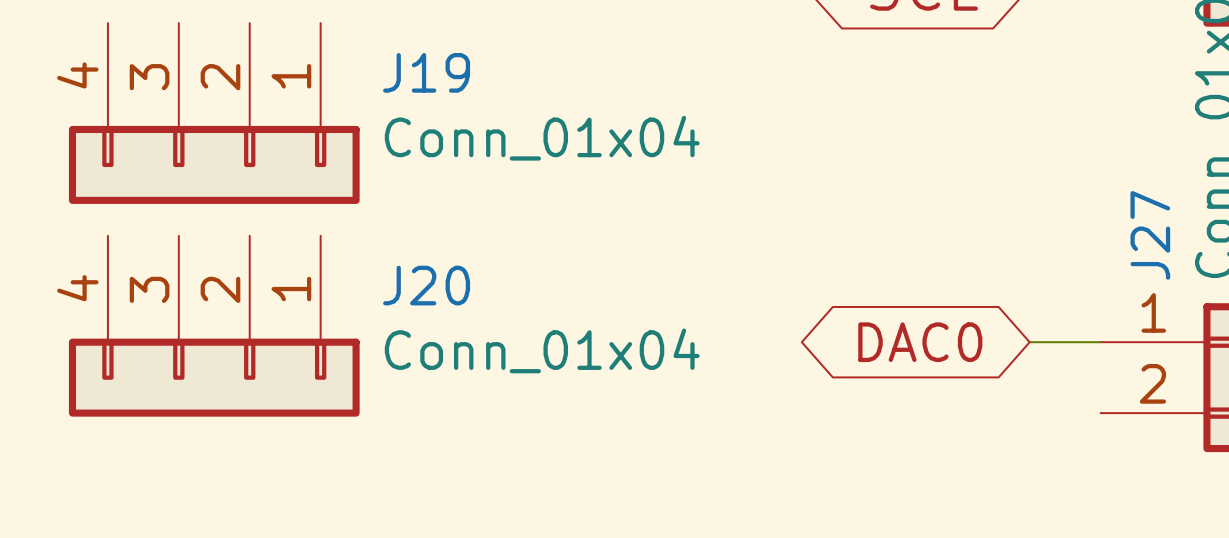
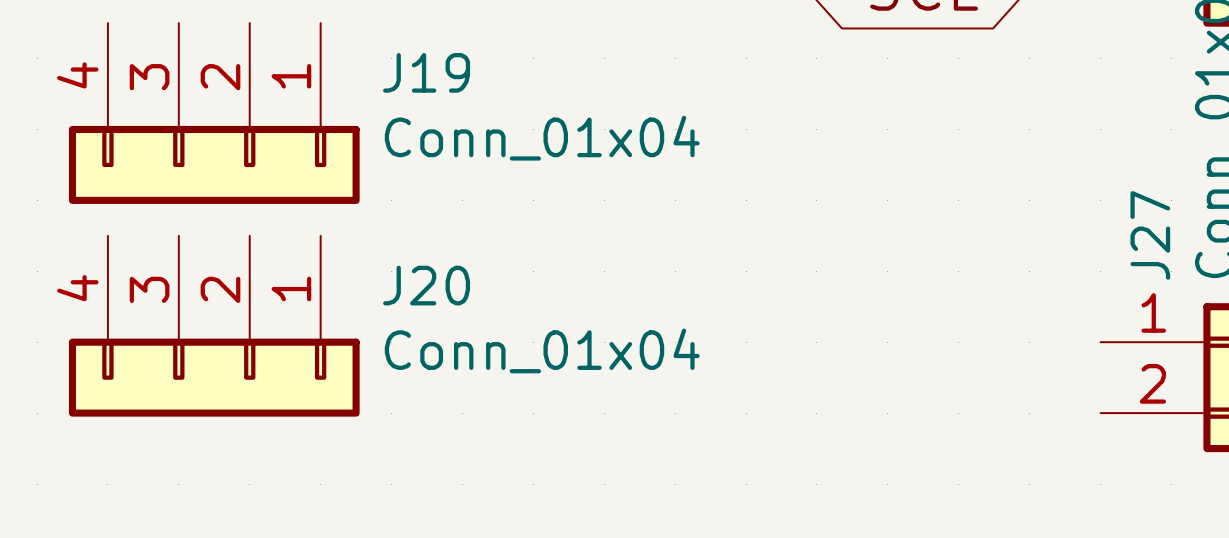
global label: DAC0 (920, 342) -> none
wire: (1029, 342) (1100, 342) -> none

